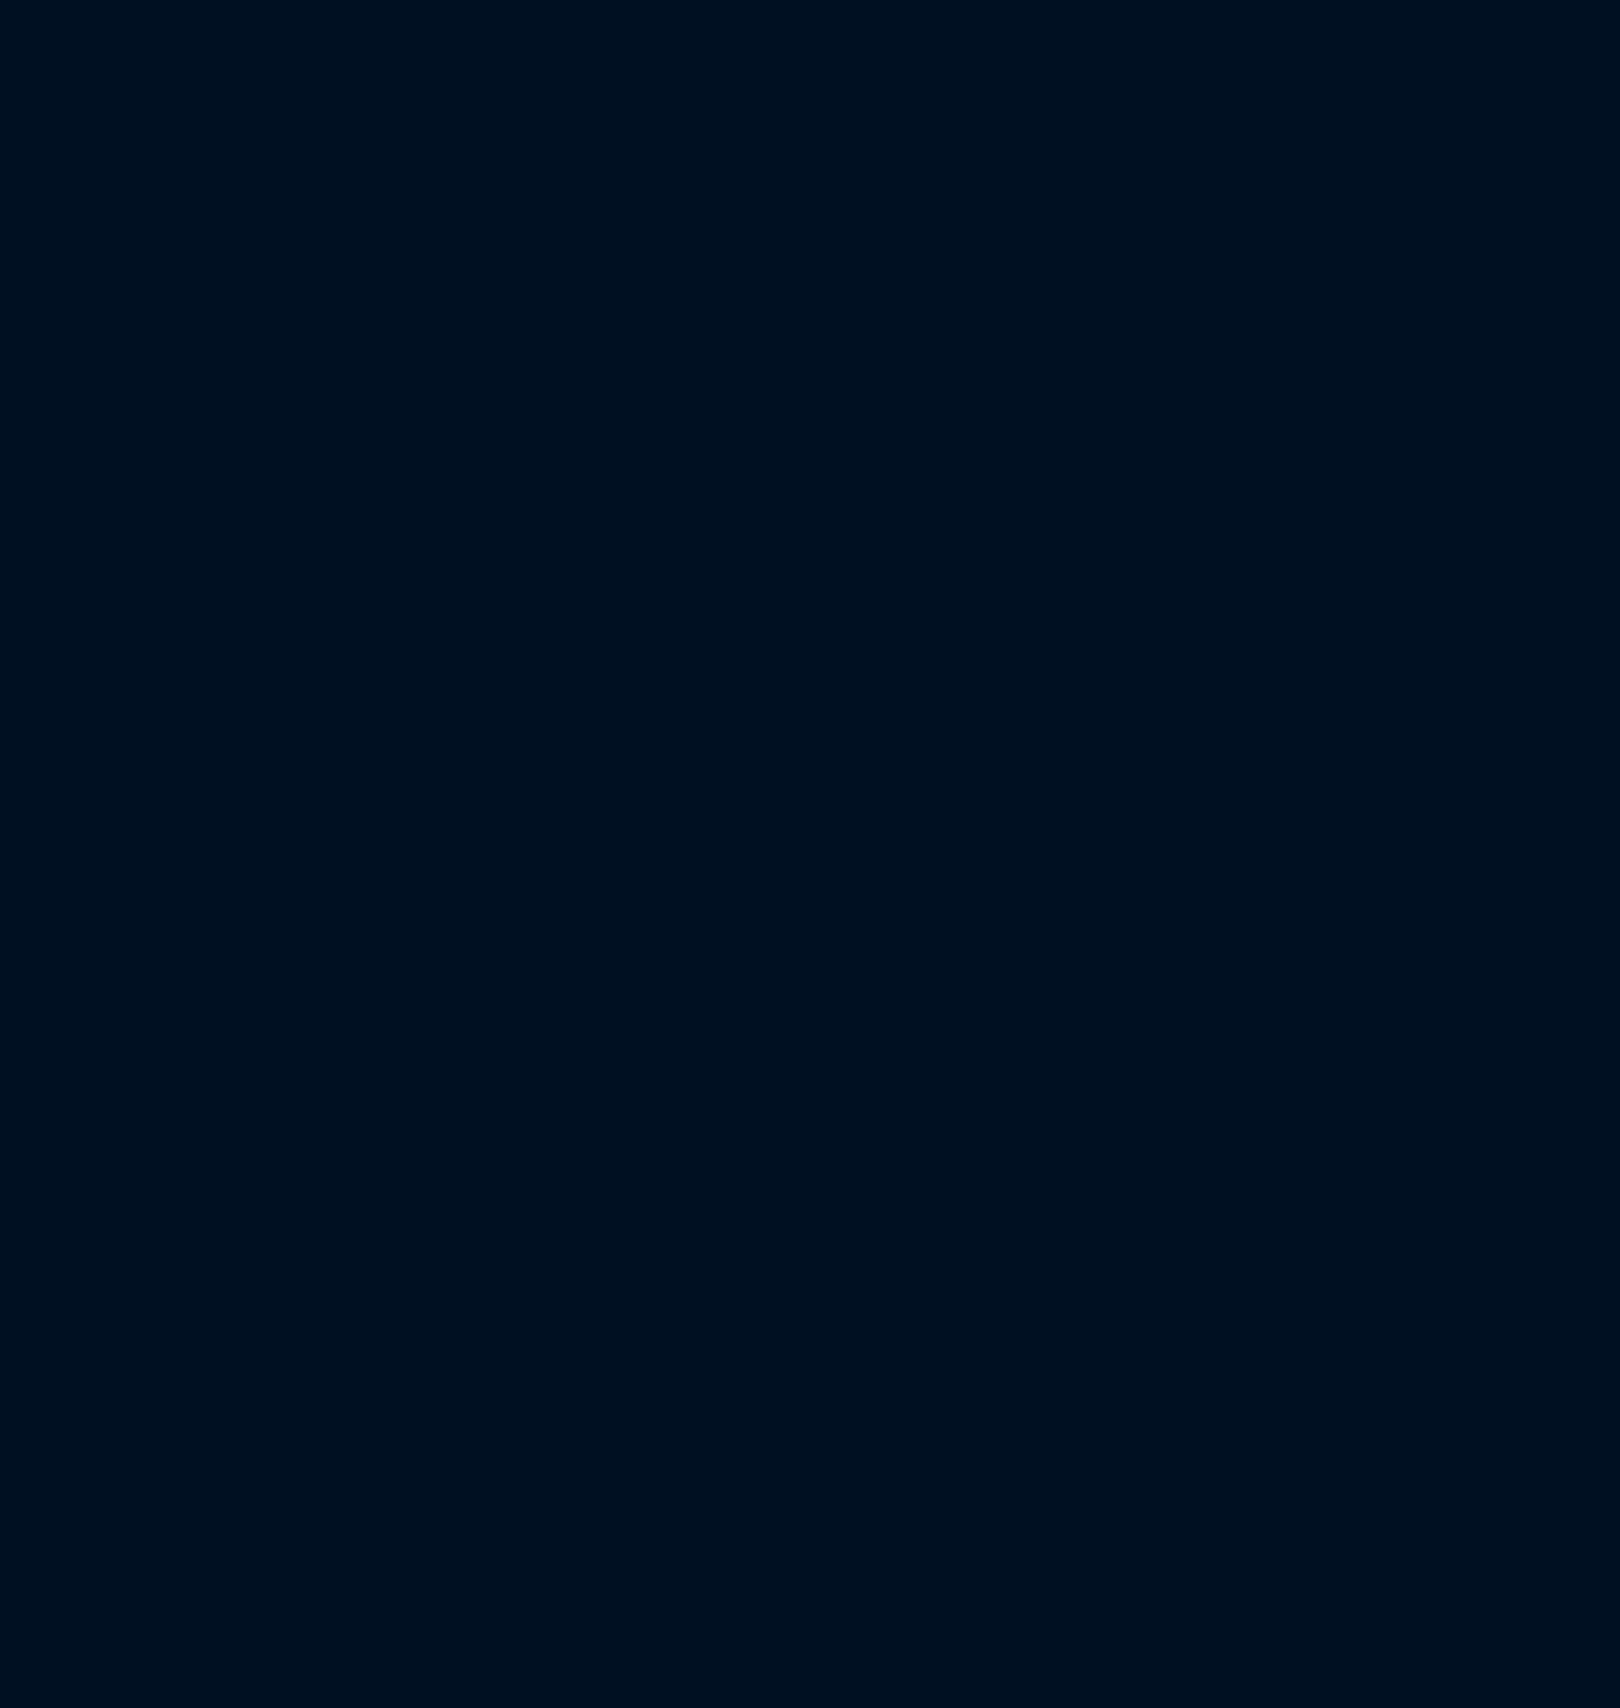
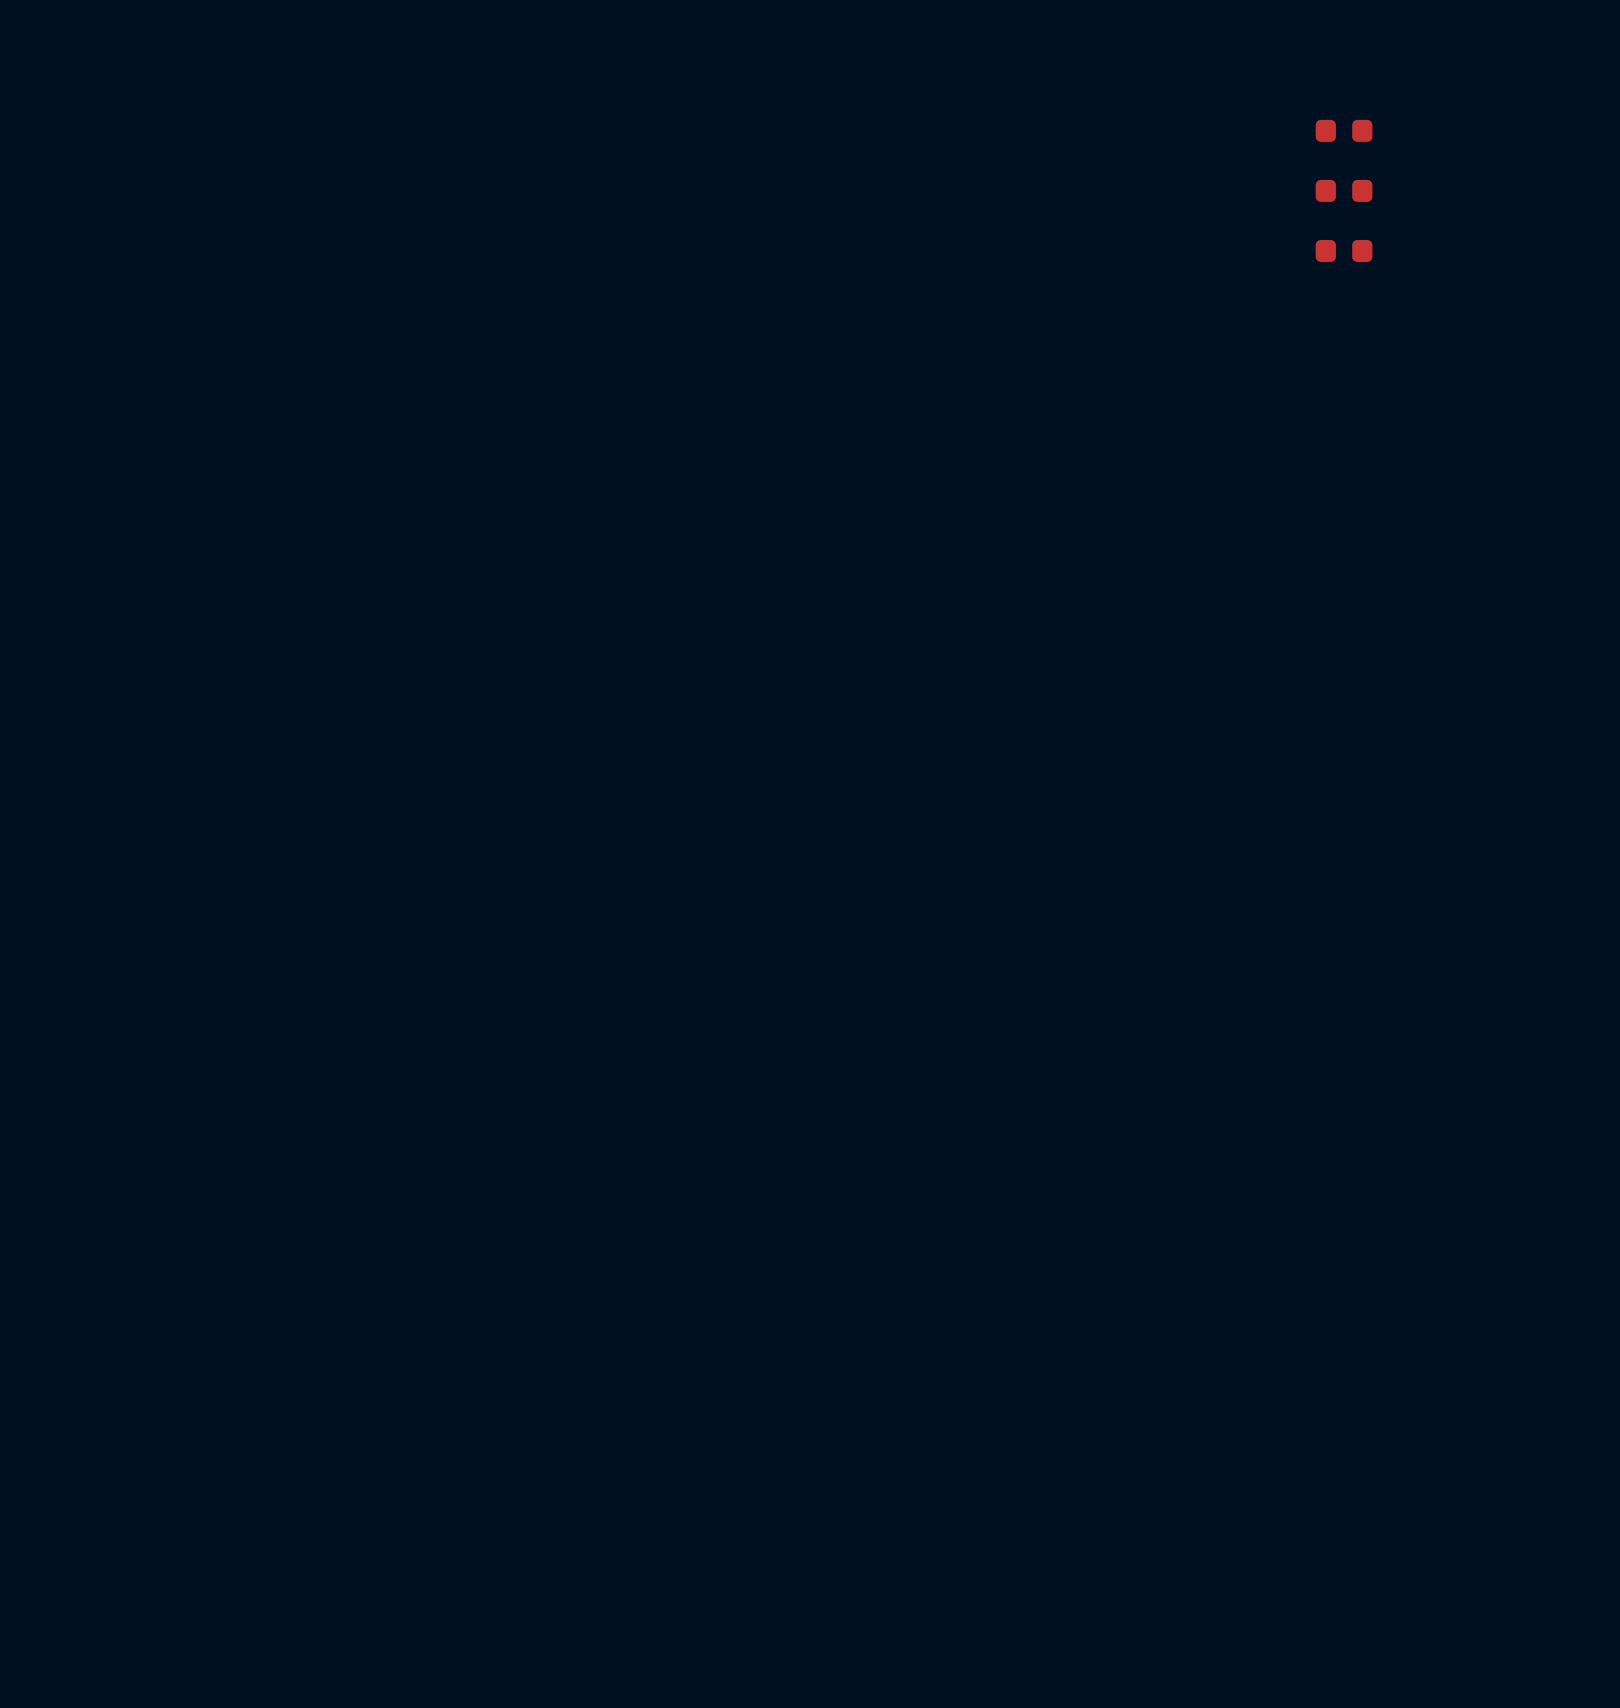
part: none -> (1344, 130)
part: none -> (1344, 190)
part: none -> (1344, 250)

